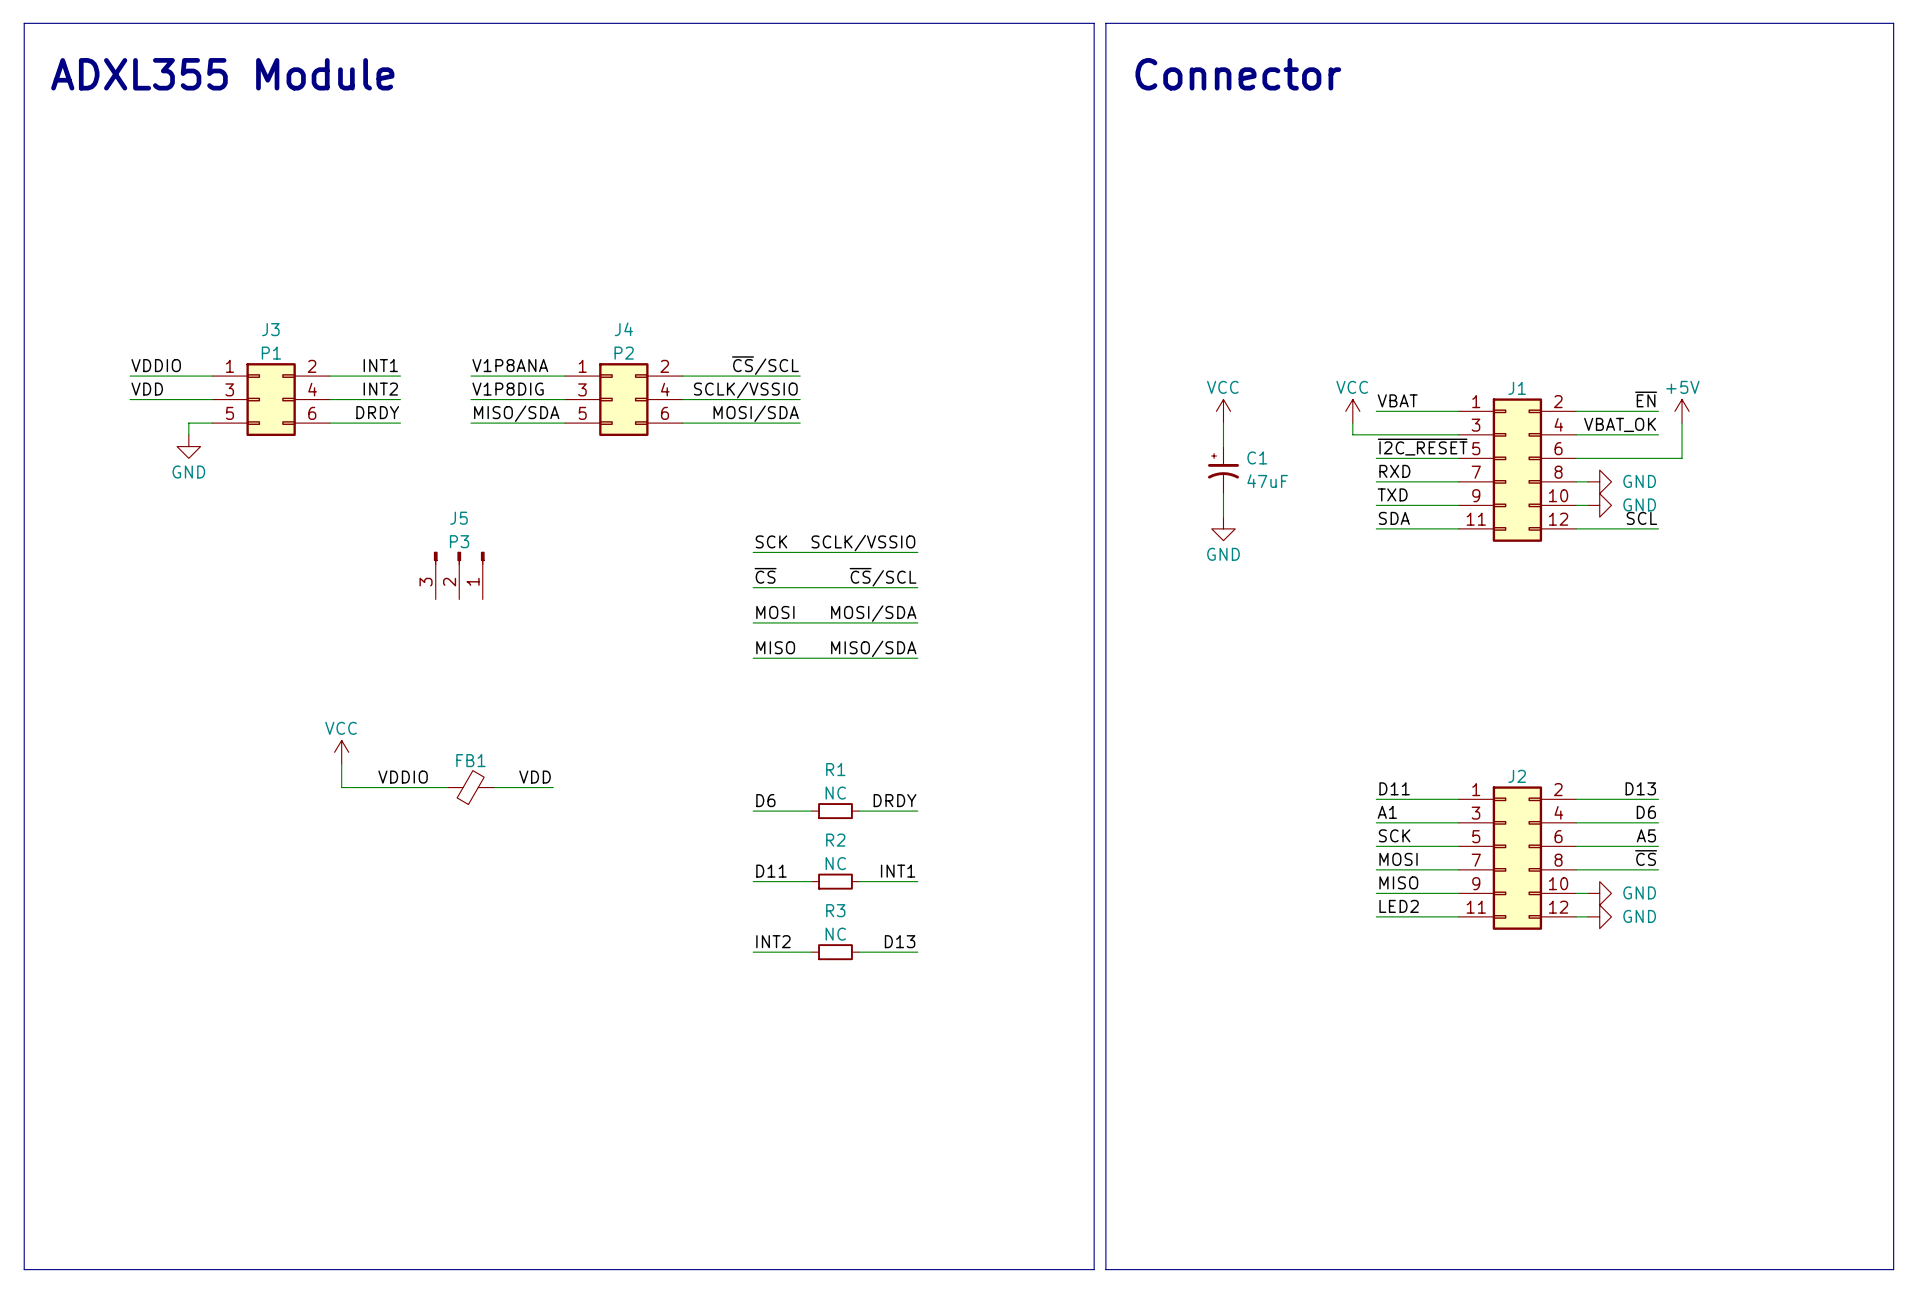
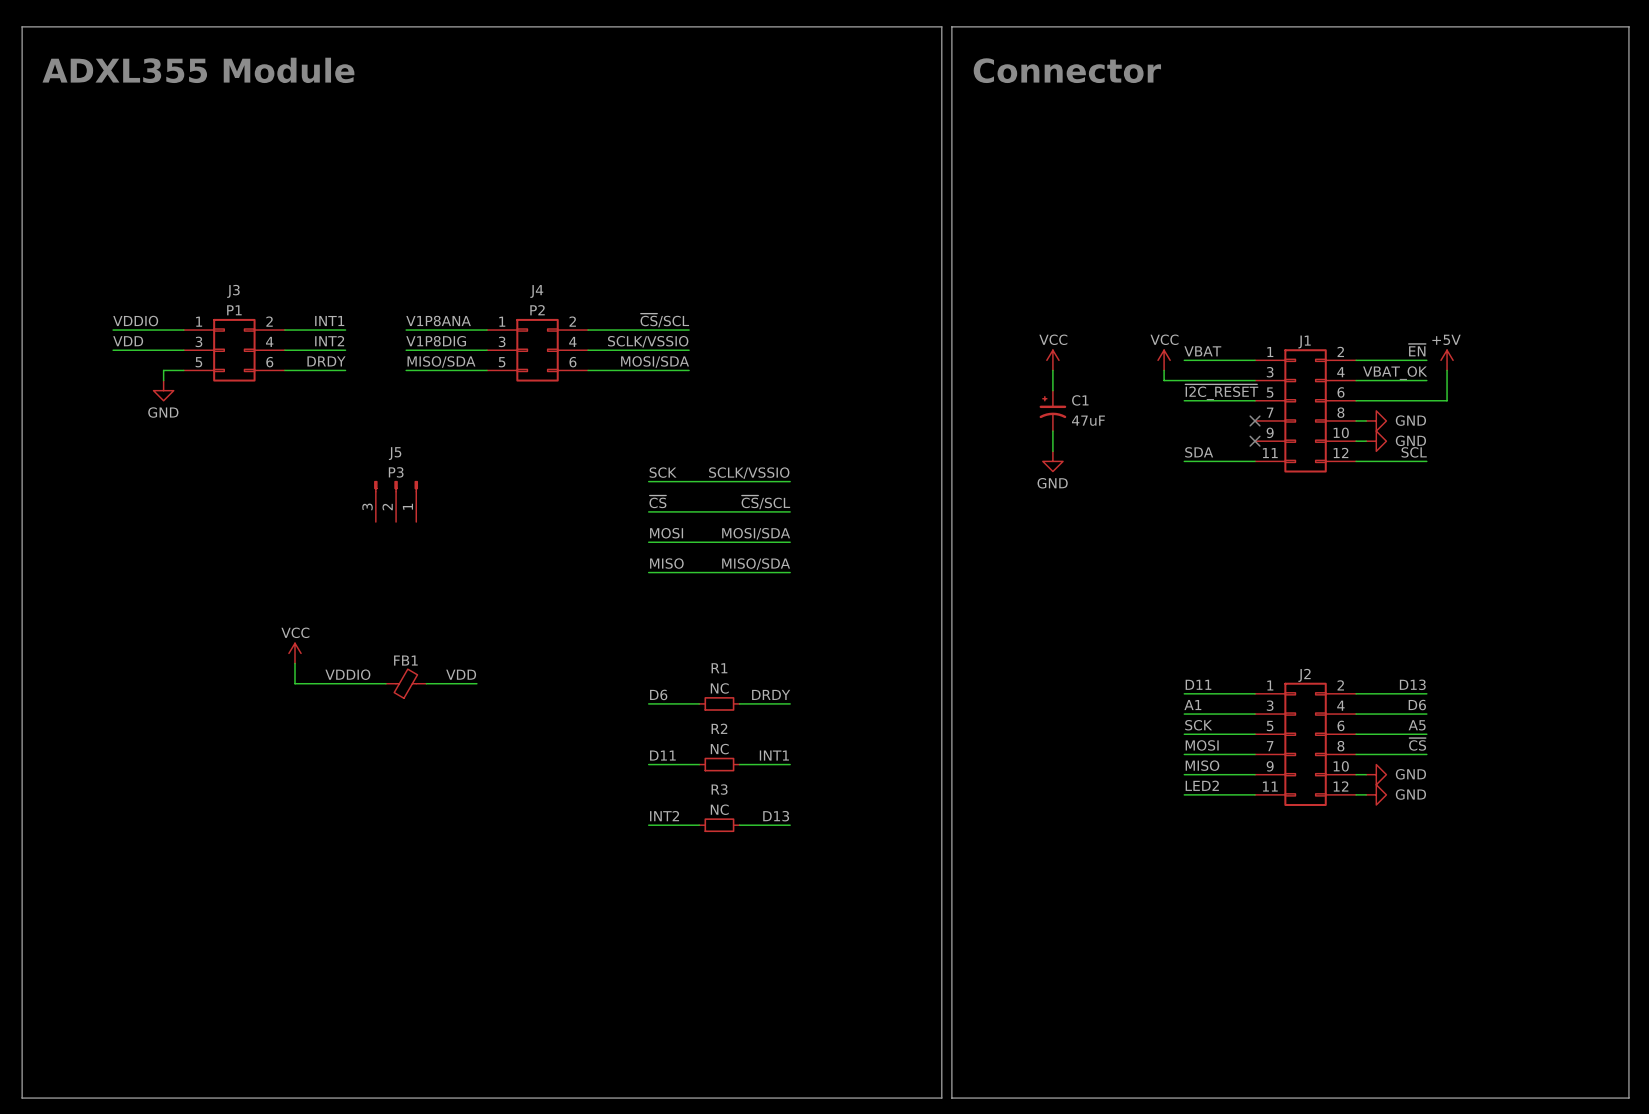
label: RXD (1394, 471) -> none
wire: (1376, 481) (1458, 481) -> none
no-connect mark: none -> (1255, 420)
label: TXD (1392, 494) -> none
wire: (1376, 505) (1458, 505) -> none
no-connect mark: none -> (1255, 441)

